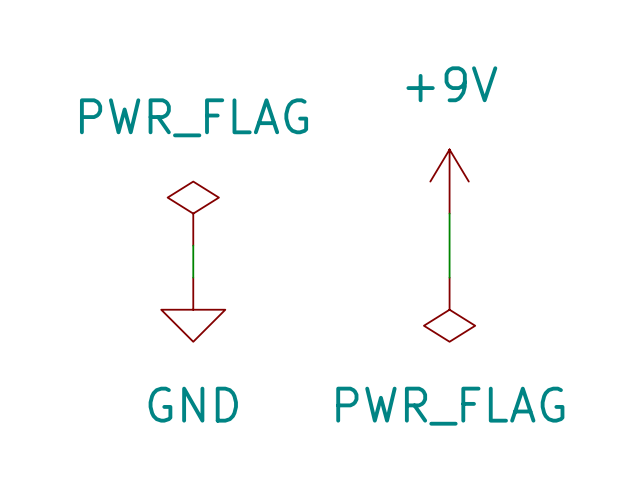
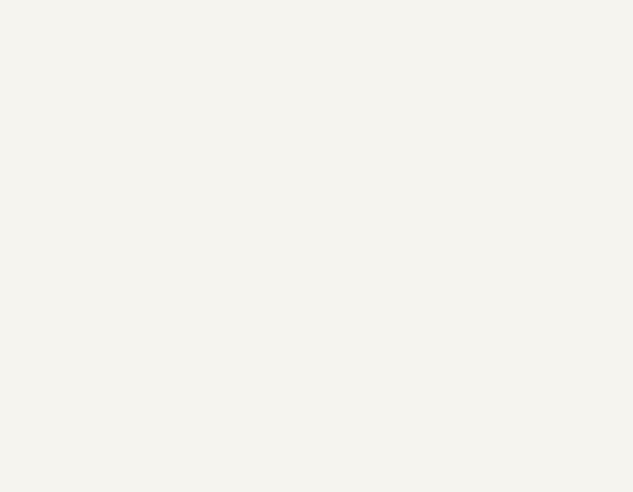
power symbol: +9V (449, 181) -> none
power symbol: PWR_FLAG (193, 213) -> none
wire: (449, 213) (449, 277) -> none
wire: (193, 245) (193, 277) -> none
power symbol: GND (193, 309) -> none
power symbol: PWR_FLAG (449, 309) -> none

